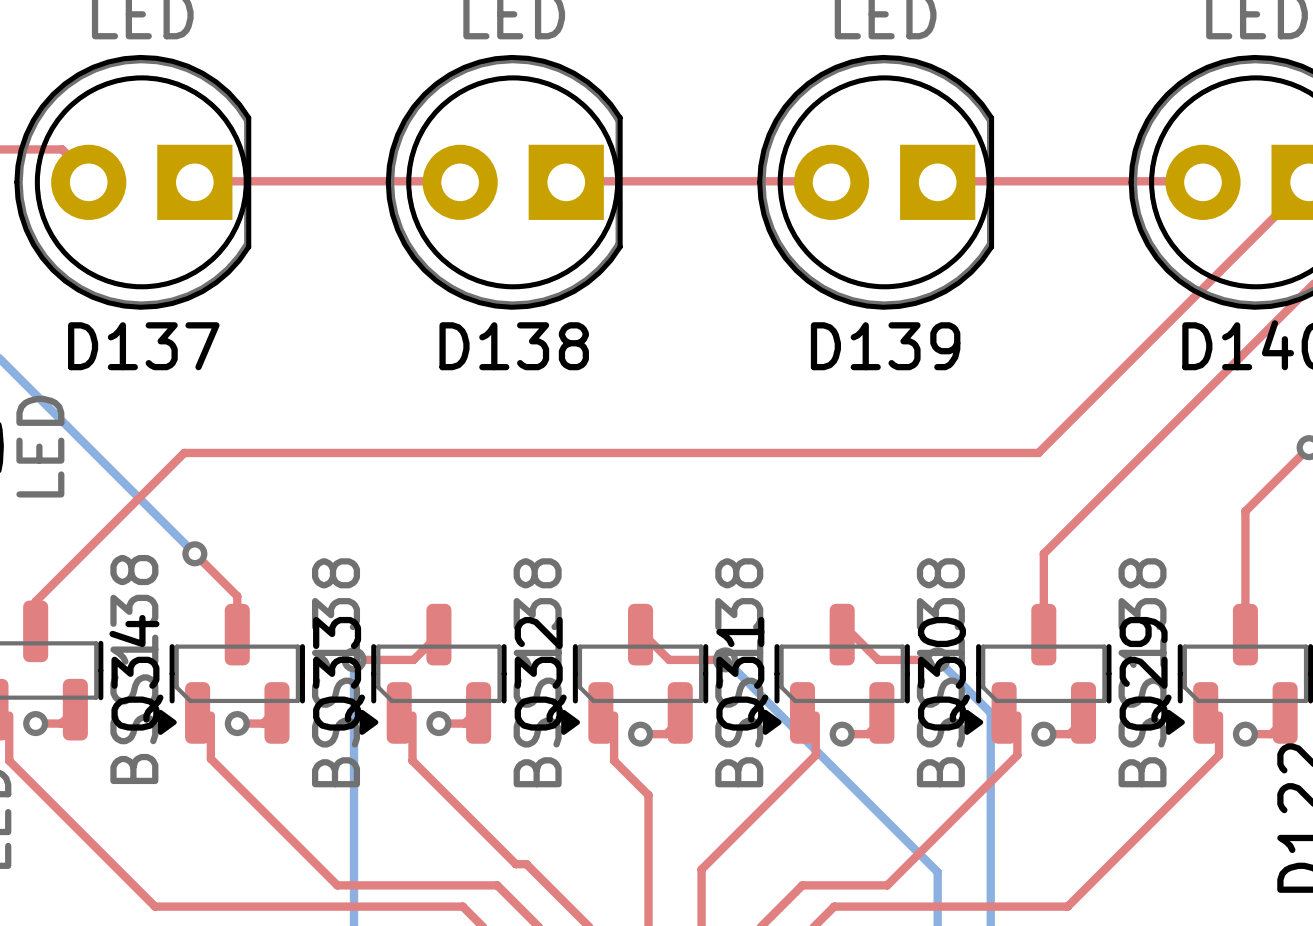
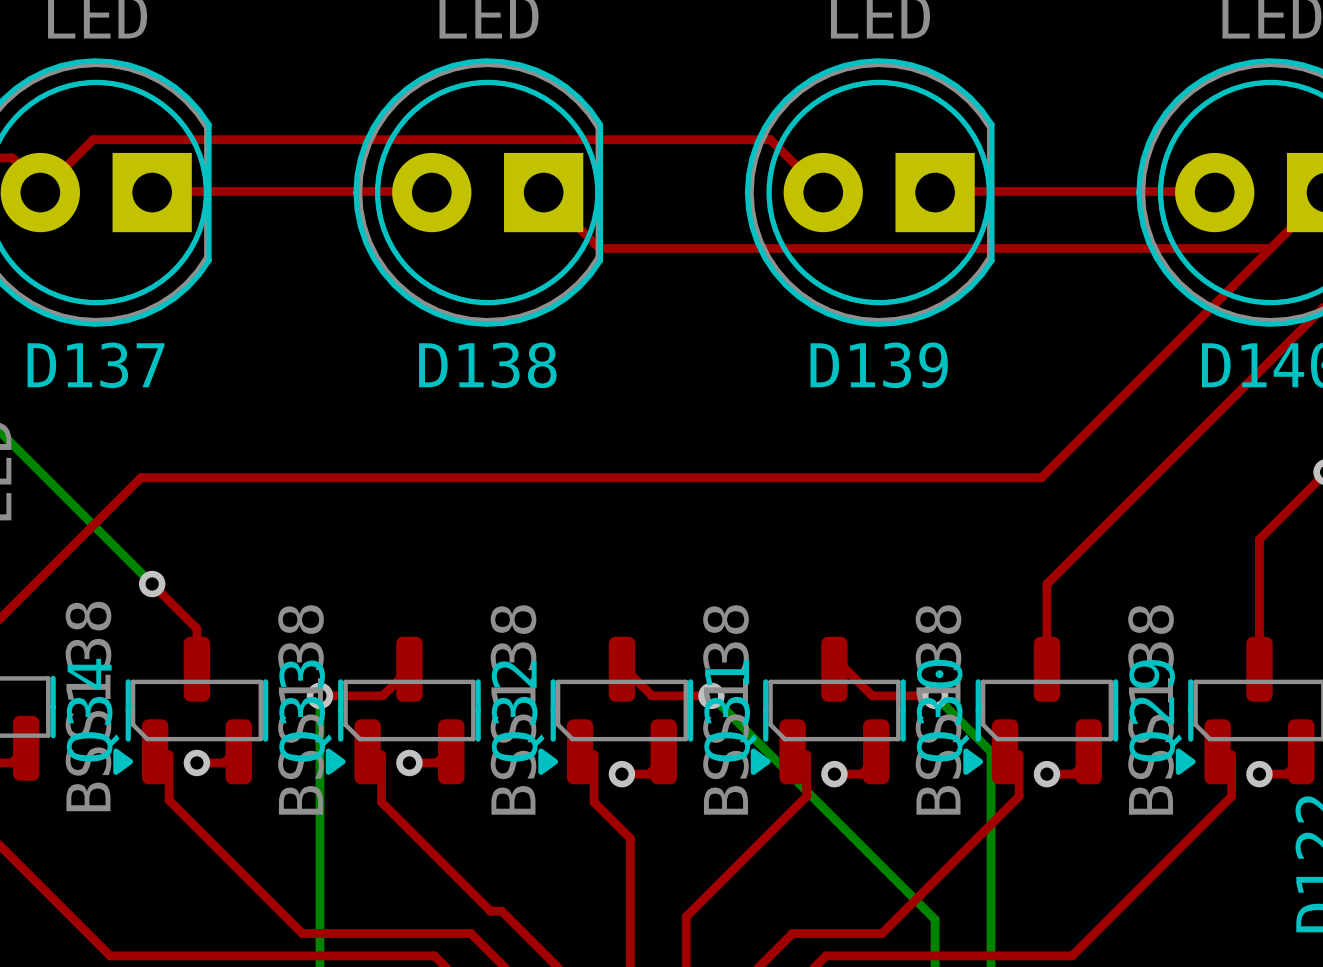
top track: (571, 181) (836, 181) -> none
top track: none -> (40, 192) (93, 139) (770, 139) (823, 192)
top track: none -> (543, 192) (599, 248) (1270, 248)

